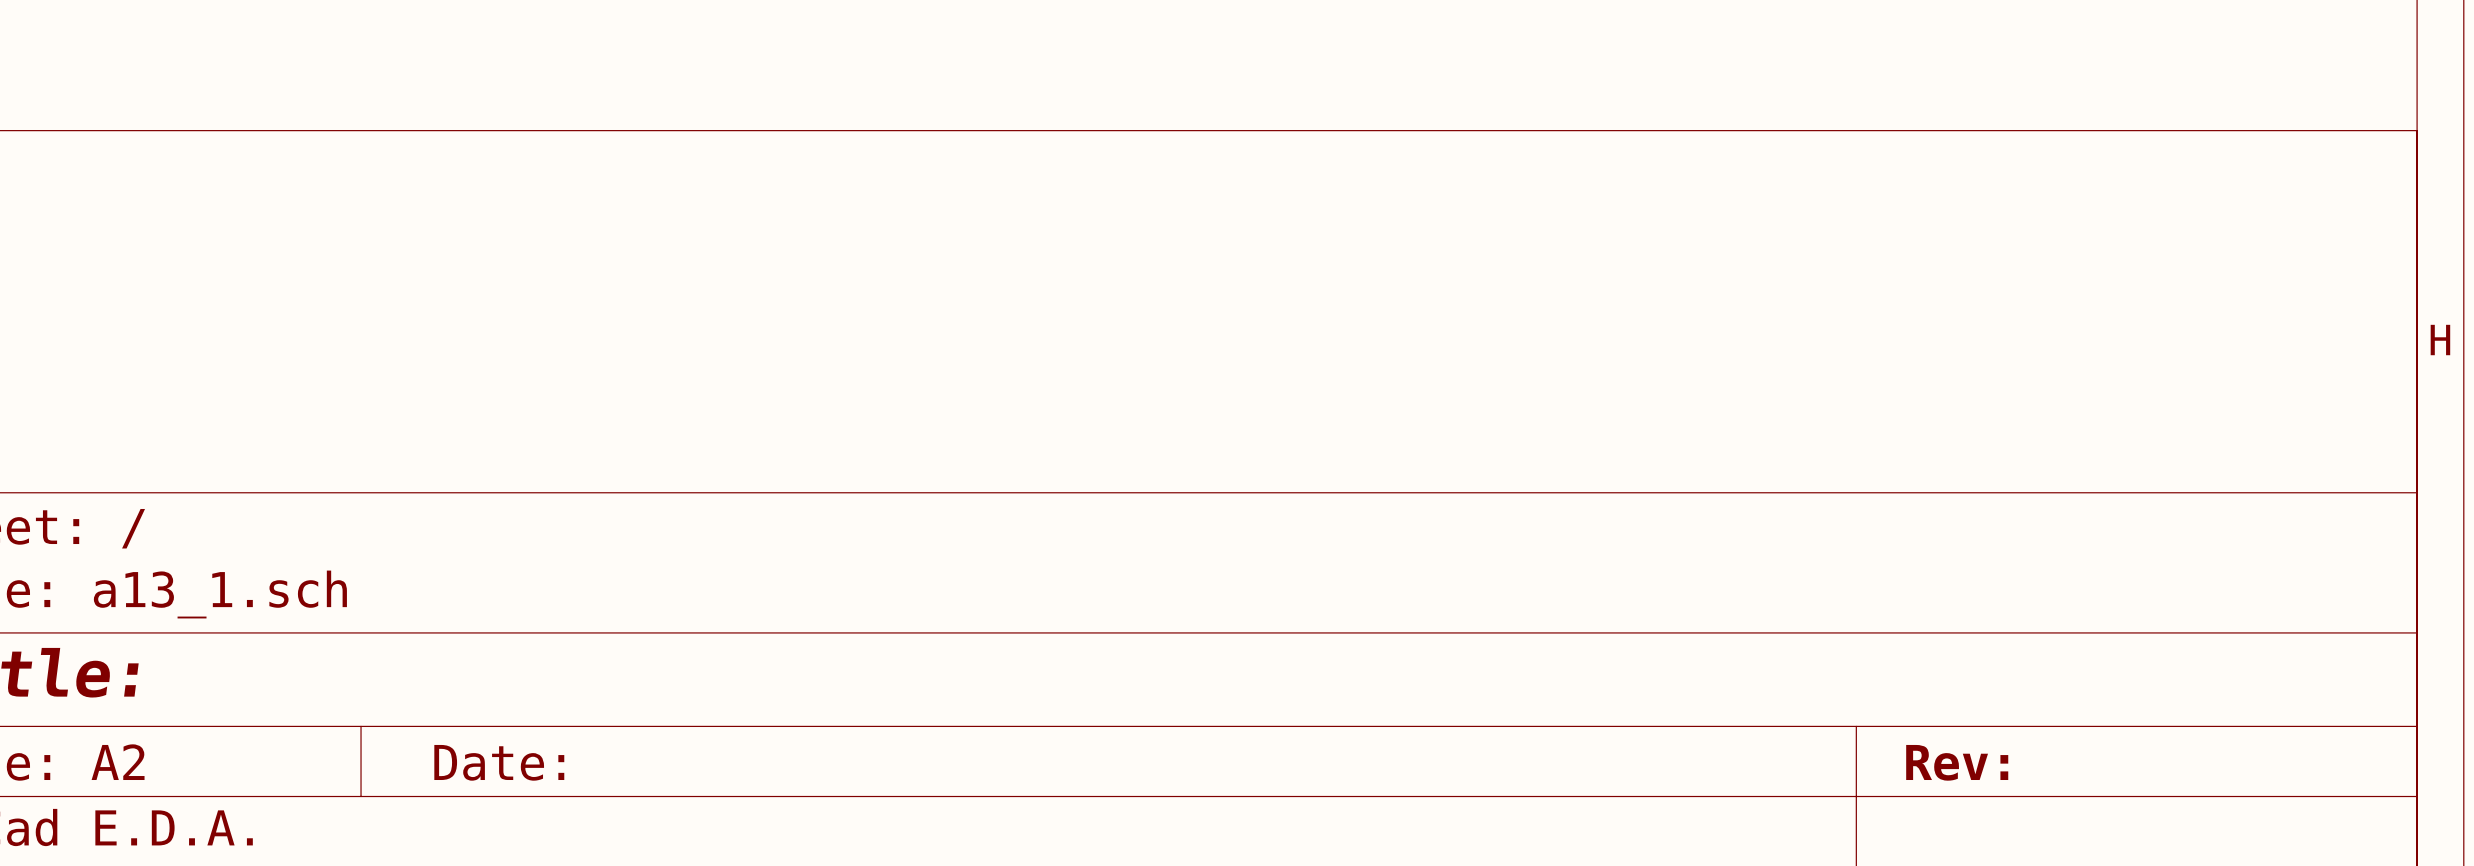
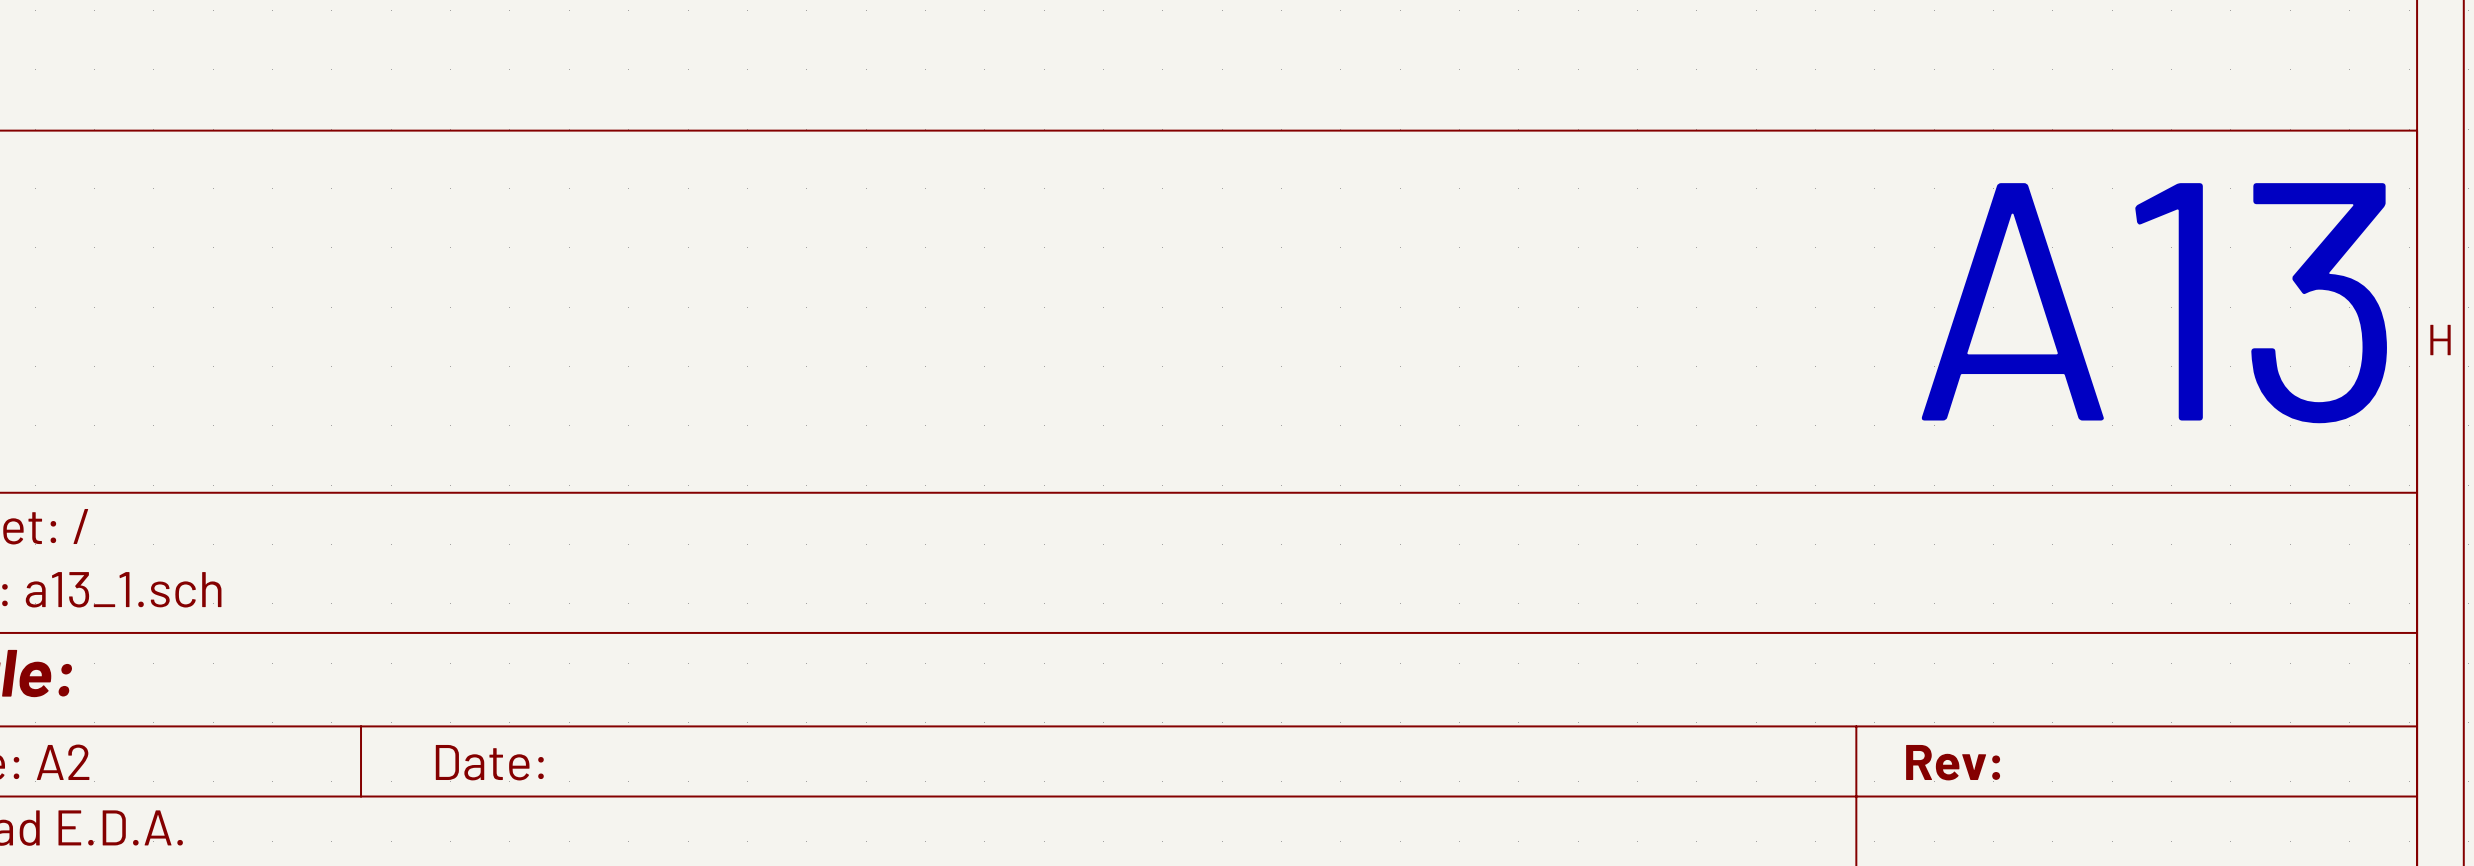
text: none -> A13 (2154, 303)

